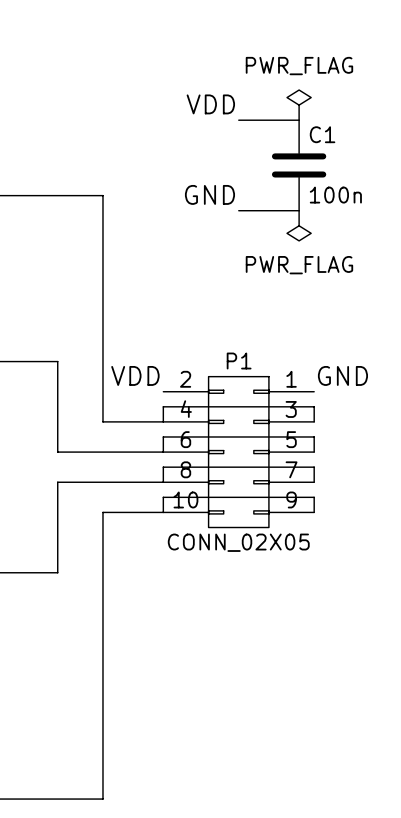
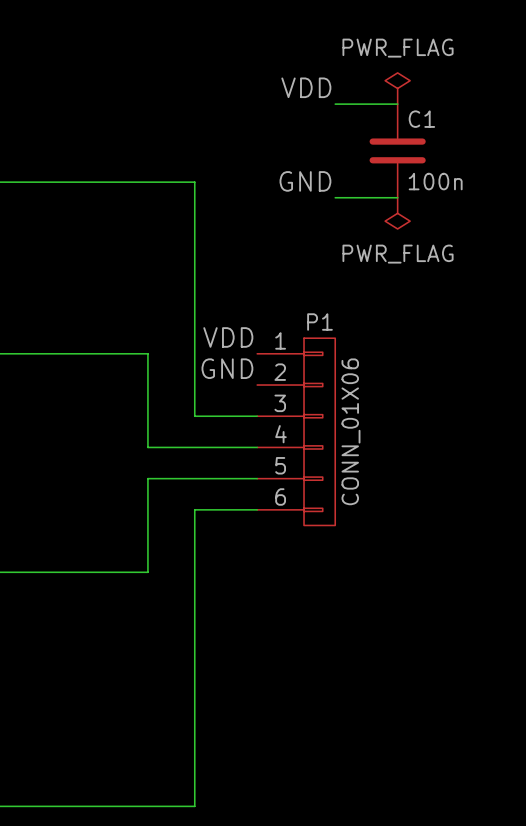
label: none -> VDD (228, 337)
P1 name position: P1 (239, 361) -> P1 (319, 322)
label: VDD (135, 375) -> GND (227, 368)
label: GND (342, 375) -> none
P1 symbol: [163, 376, 315, 528] -> [257, 338, 336, 526]
wire: (163, 421) (163, 406) (314, 406) (314, 421) -> none
wire: (163, 452) (163, 436) (314, 436) (314, 452) -> none
wire: (163, 482) (163, 467) (314, 467) (314, 482) -> none
wire: (163, 512) (163, 497) (314, 497) (314, 512) -> none
P1 value: CONN_02X05 (238, 542) -> CONN_01X06 (350, 431)

